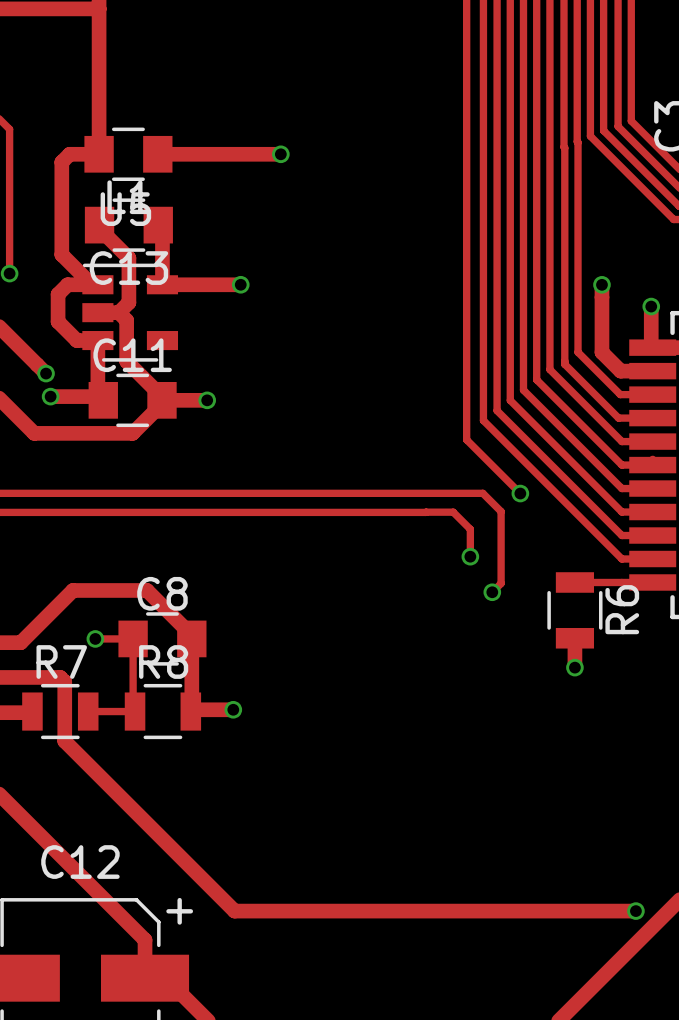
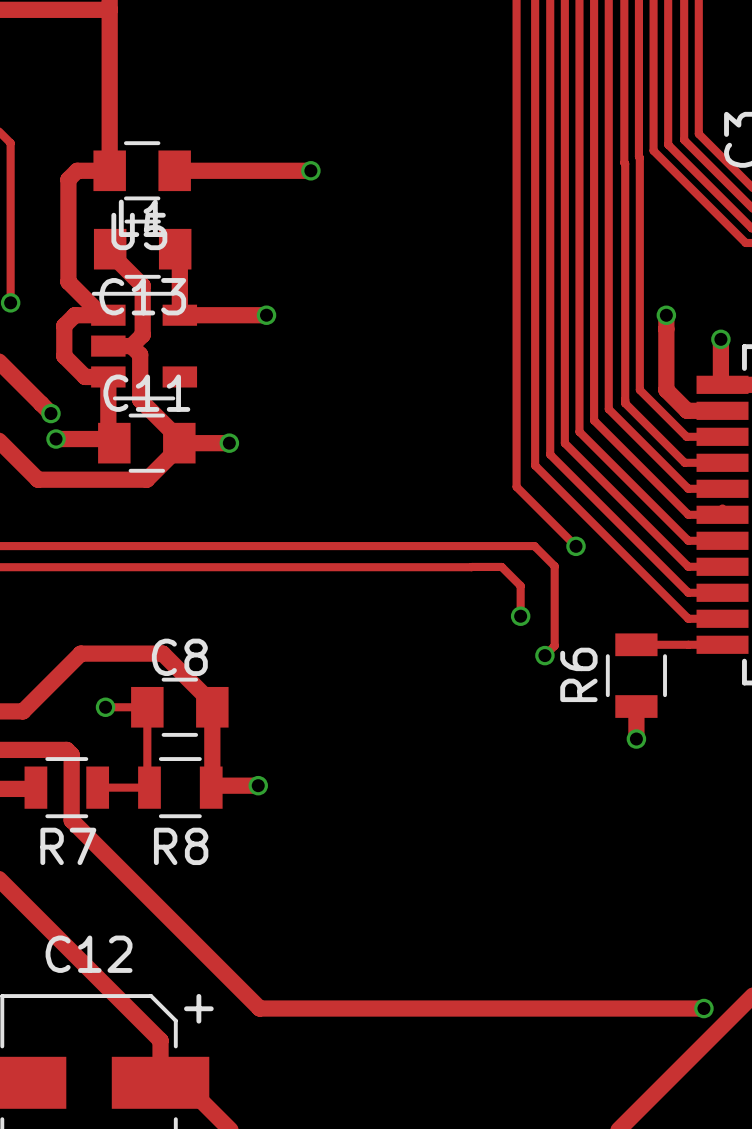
R6 name position: R6 (622, 609) -> R6 (578, 674)
R7 name position: R7 (61, 662) -> R7 (68, 846)
R8 name position: R8 (163, 662) -> R8 (181, 846)

